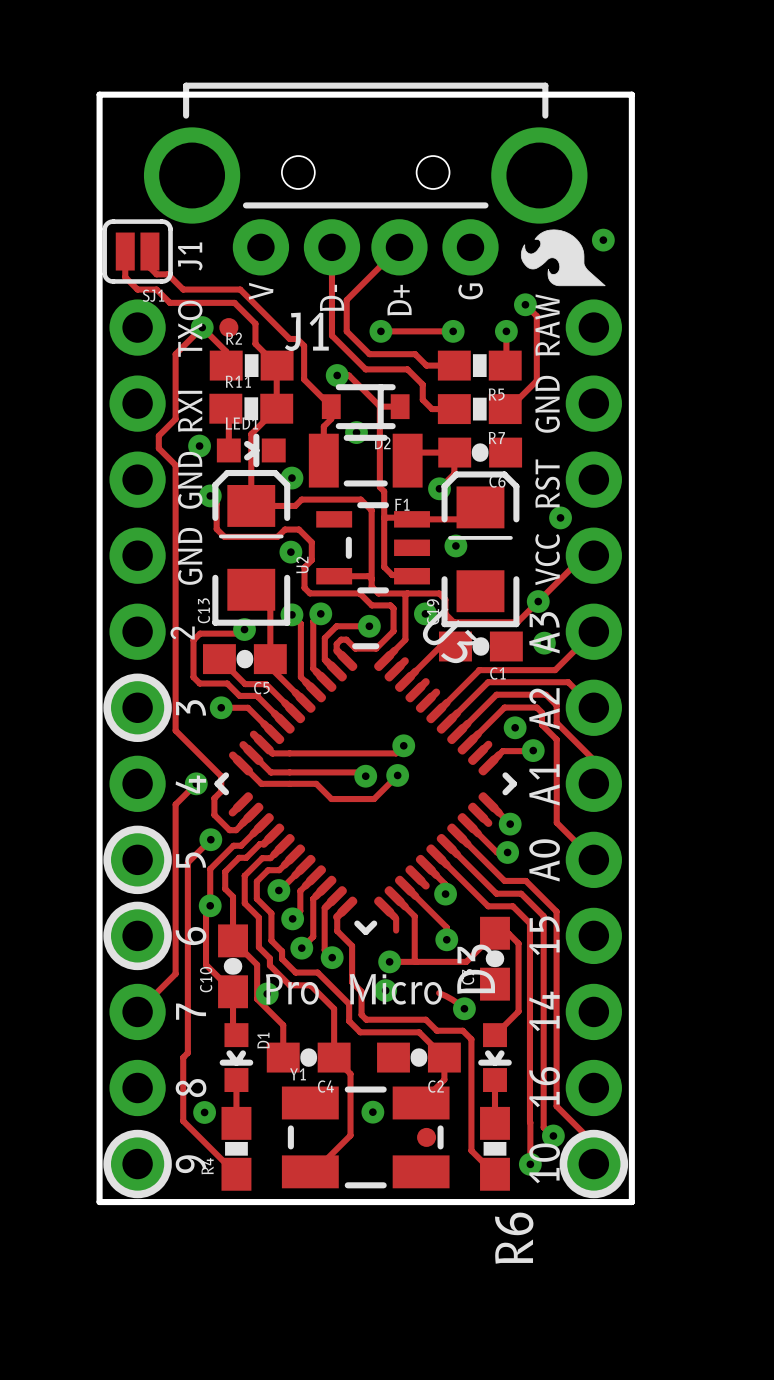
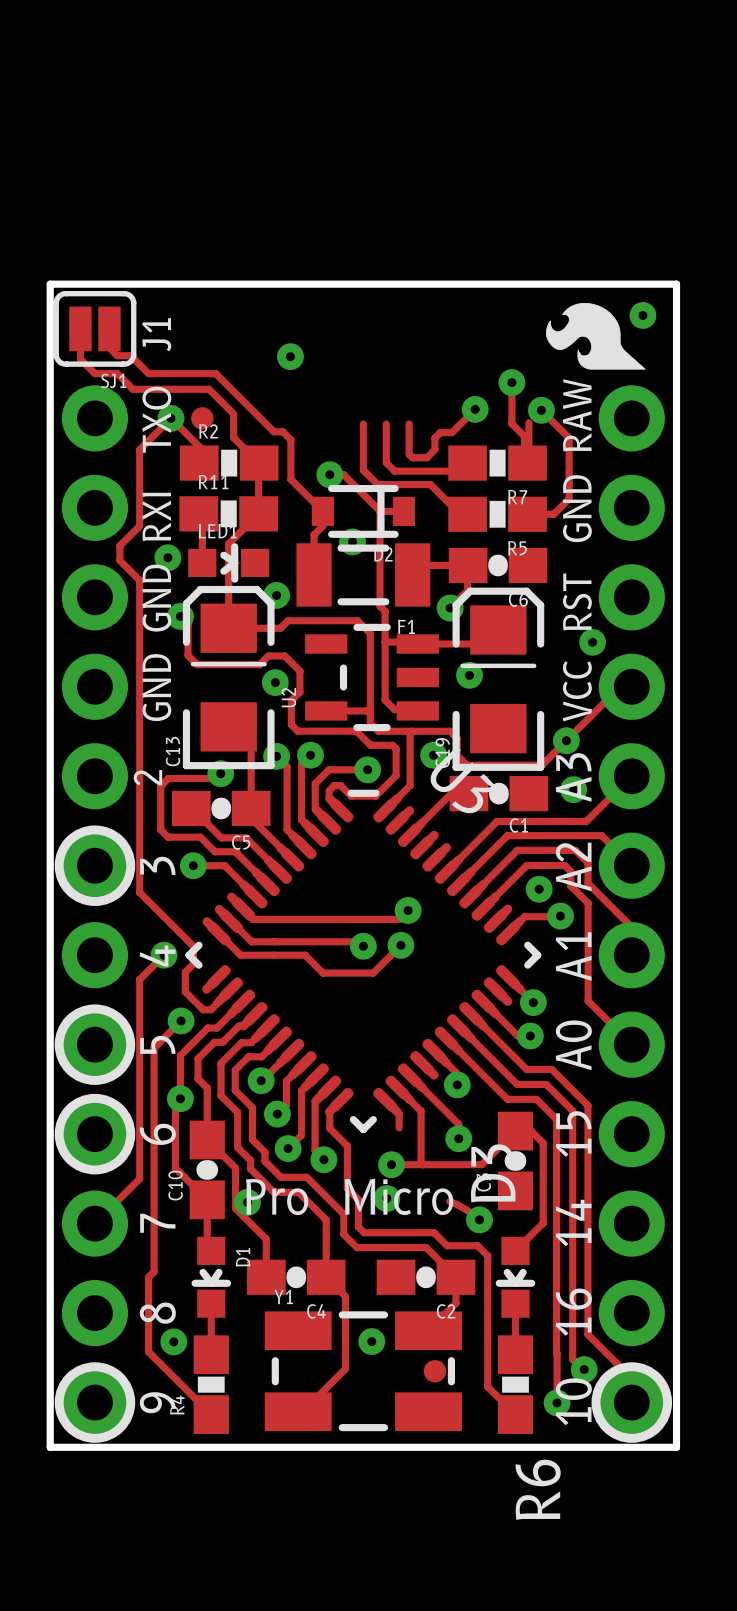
J1: (365, 179) -> none
board edge: (99, 213) (99, 94) (631, 94) (631, 213) -> (50, 284) (676, 284)
track: (331, 247) (331, 335) (365, 369) (407, 369) (422, 384) (422, 399) (432, 409) (448, 409) -> (363, 424) (363, 470) (377, 484) (430, 484) (460, 514)
track: (399, 247) (346, 300) (346, 331) (369, 354) (415, 354) (426, 365) (454, 365) -> (386, 424) (386, 462) (394, 471) (460, 471) (467, 463)
via: none -> (290, 356)
text: V (261, 291) -> none
text: G (470, 291) -> none
track: none -> (511, 382) (511, 423) (524, 436) (524, 460) (527, 463) (527, 451)
via: none -> (511, 382)
text: D- (332, 298) -> none
text: D+ (399, 300) -> none
track: (525, 304) (536, 316) (536, 380) (508, 409) -> (541, 410) (569, 438) (569, 498) (553, 514) (531, 514)
via: (525, 304) -> none
track: none -> (475, 409) (451, 432) (440, 432) (434, 438) (434, 449) (426, 457) (412, 457) (409, 454) (409, 424)
via: none -> (541, 410)
track: (380, 331) (453, 331) -> none
via: (380, 331) -> none
via position: (453, 331) -> (475, 409)
via: (506, 331) -> none
R5 name: R5 (496, 394) -> R7 (517, 497)
R7 name: R7 (496, 438) -> R5 (517, 548)

